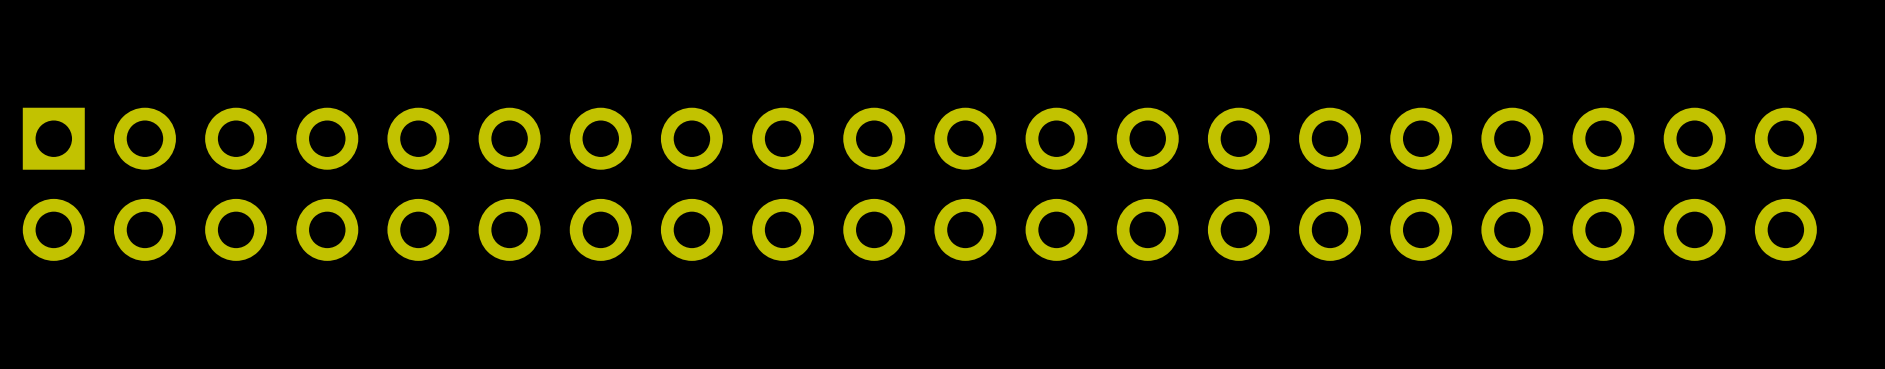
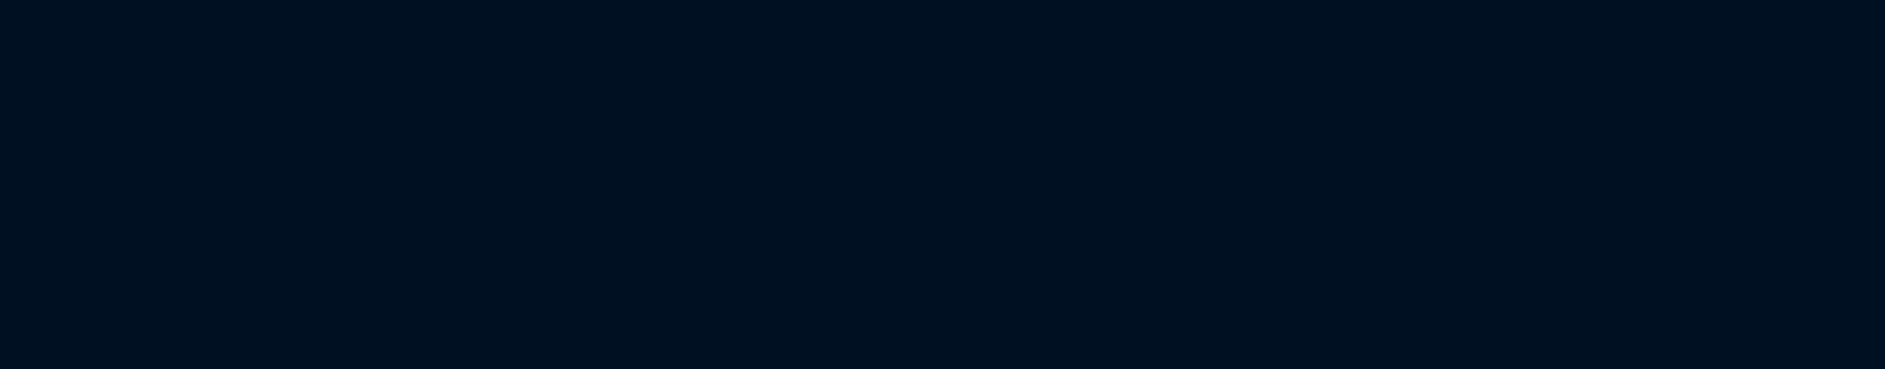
part: (919, 184) -> none

